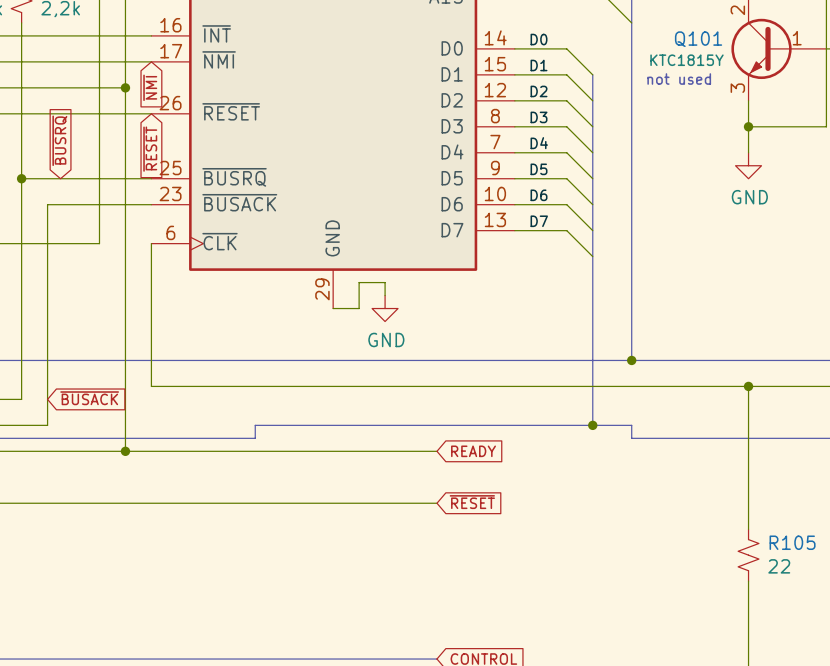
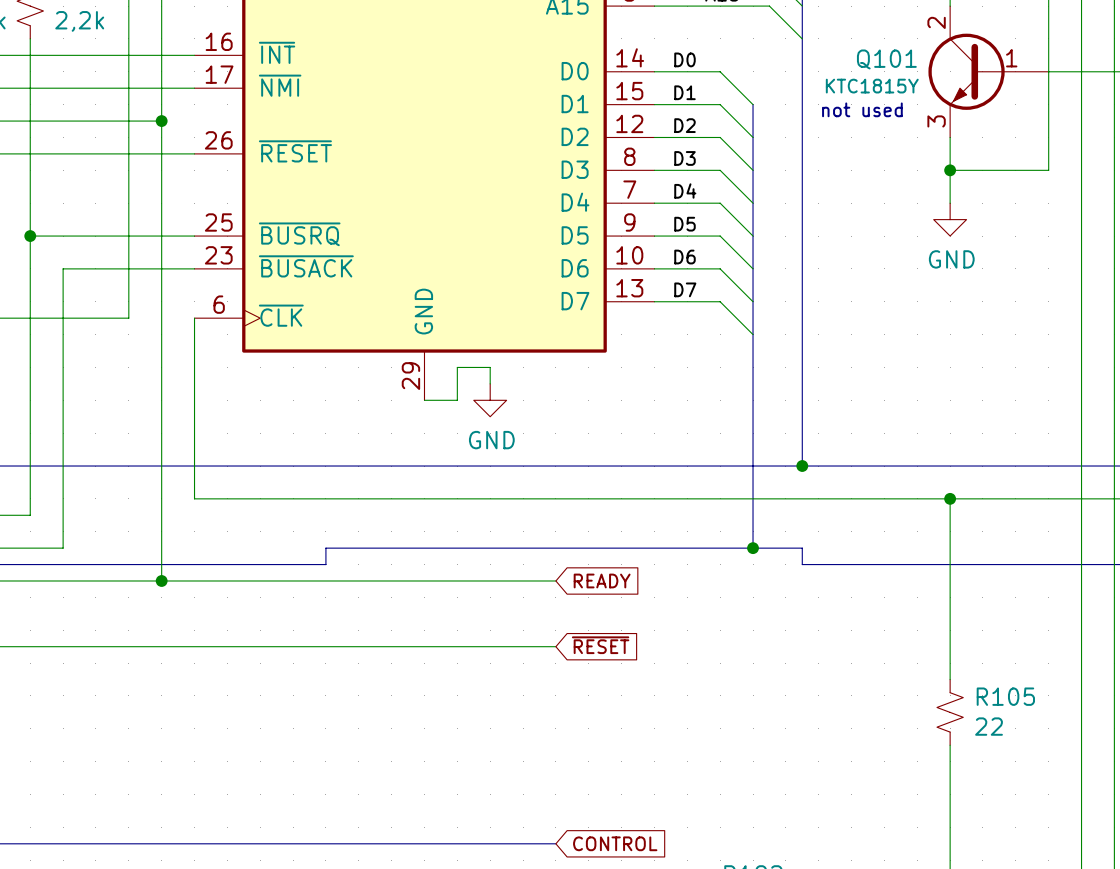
global label: ~{NMI} (150, 87) -> none
global label: ~{BUSRQ} (59, 140) -> none
global label: ~{RESET} (150, 149) -> none
global label: ~{BUSACK} (89, 398) -> none

